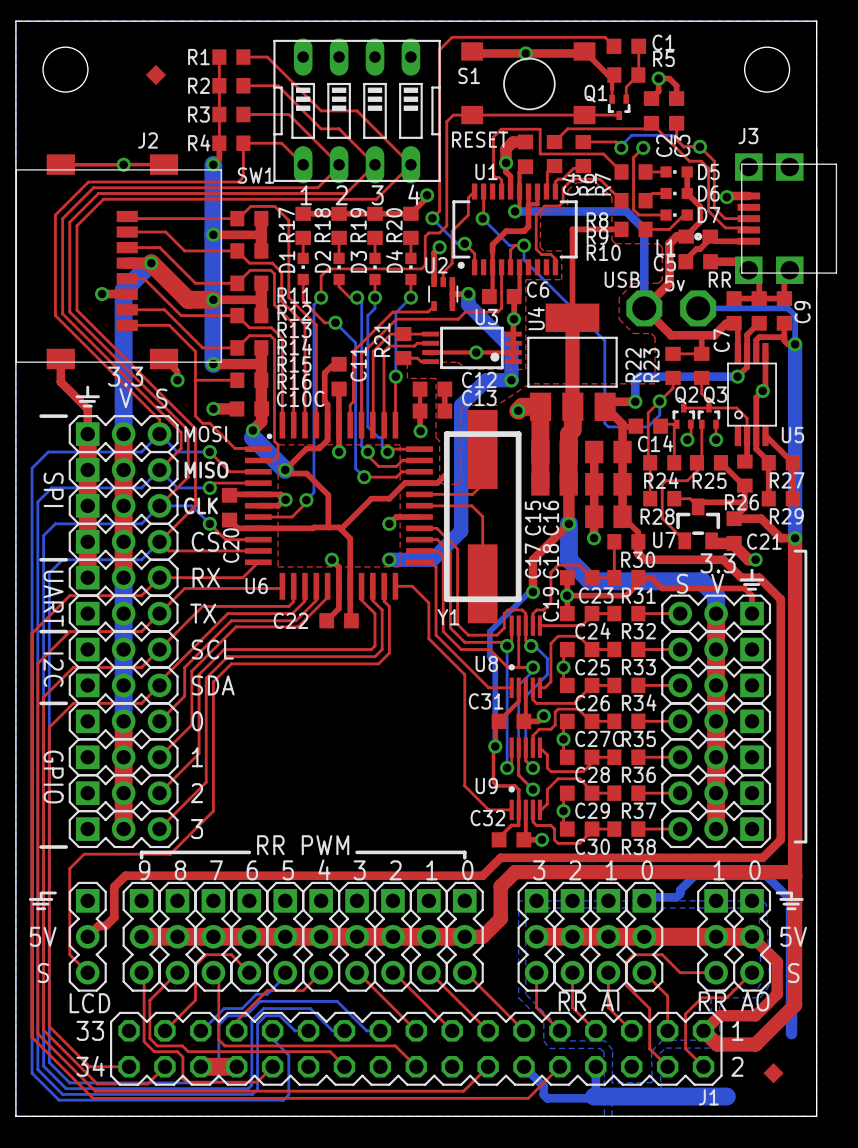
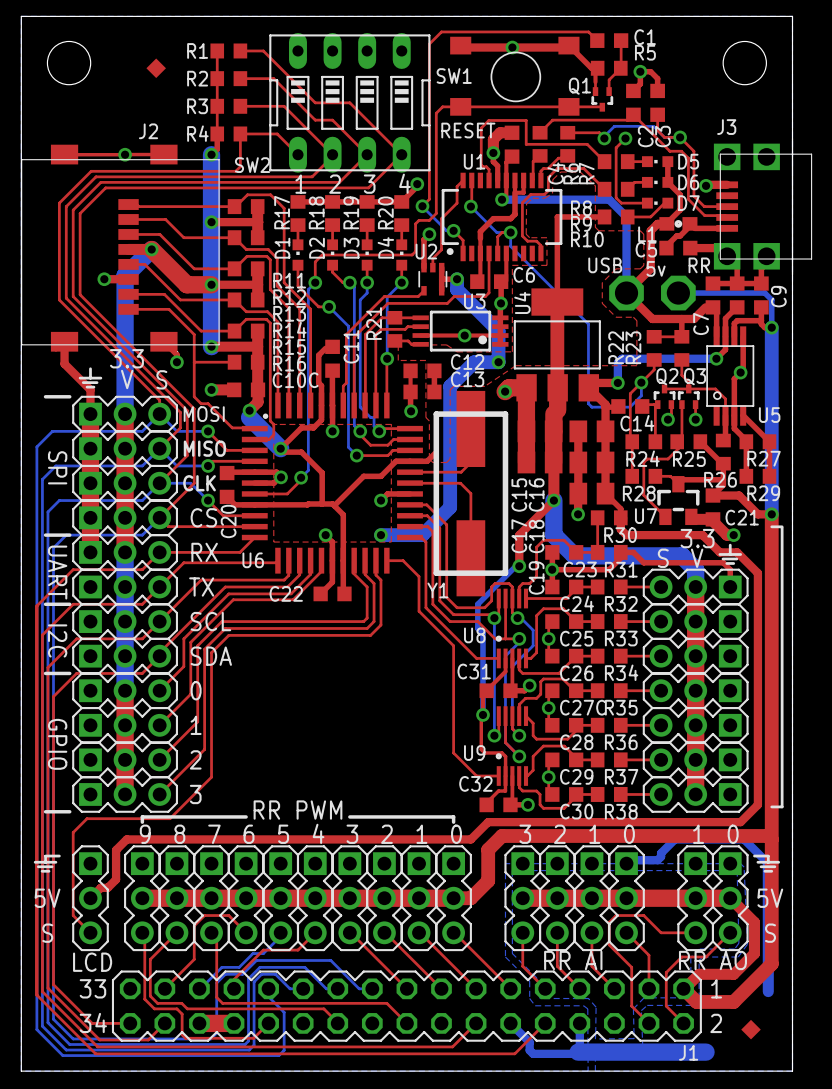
S1 name: S1 (469, 75) -> SW1 (454, 76)
SW1 name: SW1 (255, 175) -> SW2 (252, 165)

